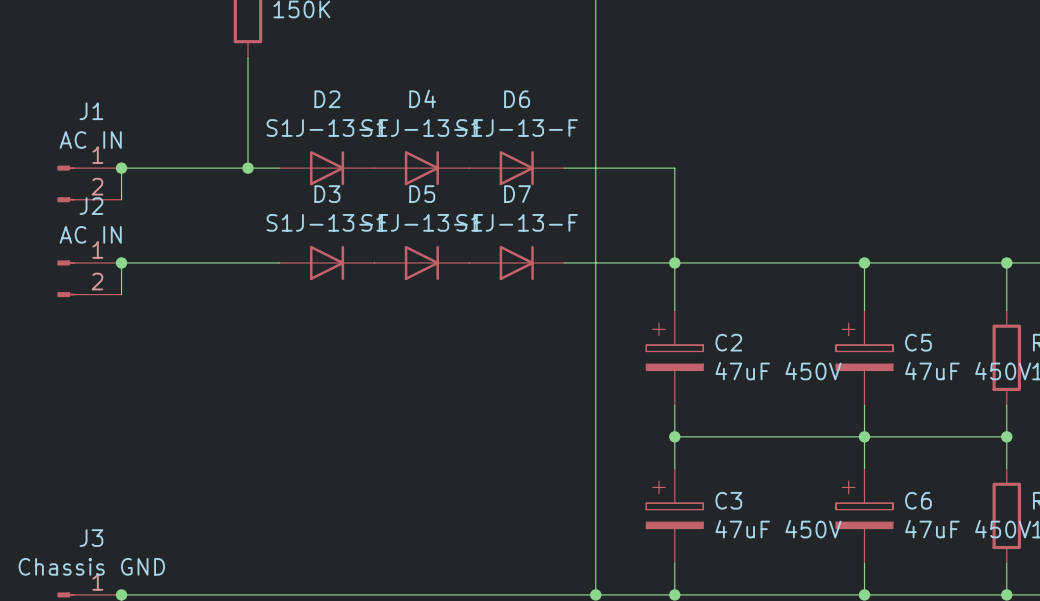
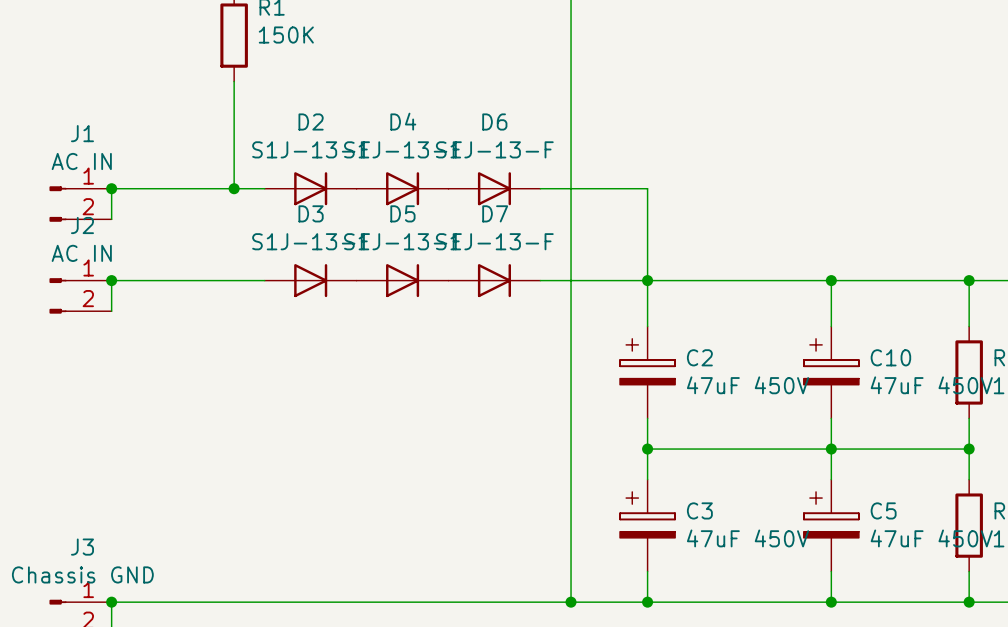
C5 name: C5 (918, 342) -> C10 (890, 357)
C6 name: C6 (918, 500) -> C5 (883, 510)

